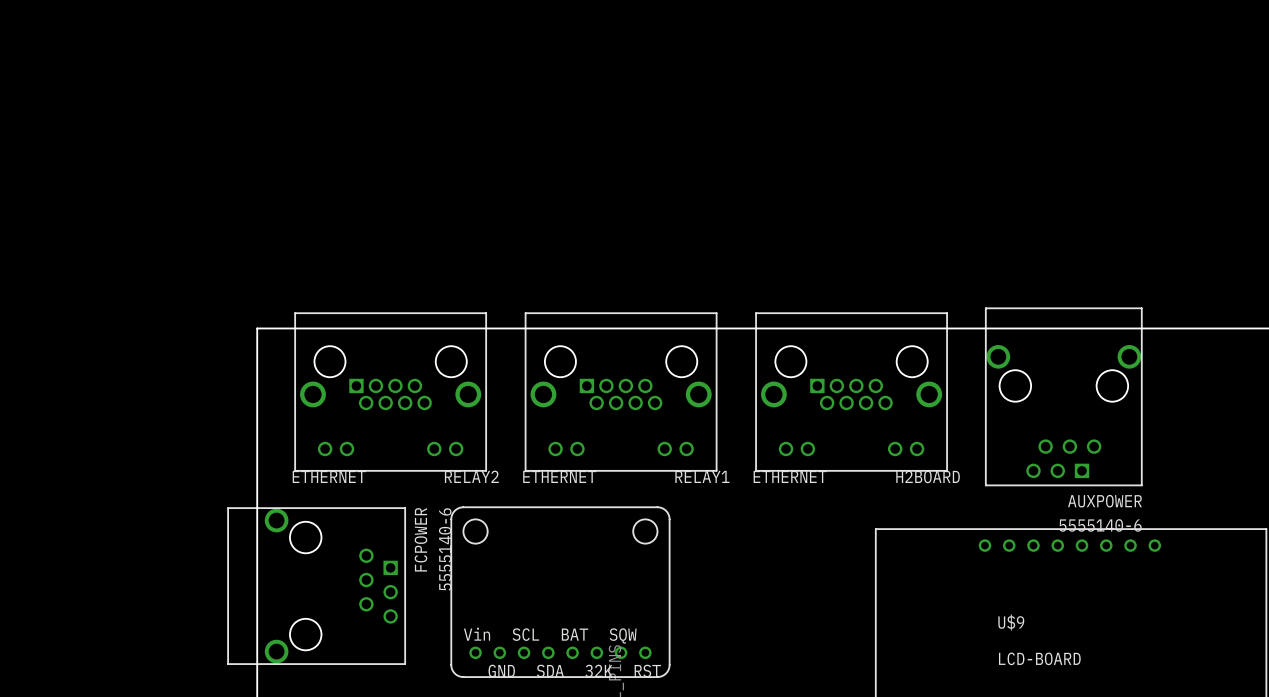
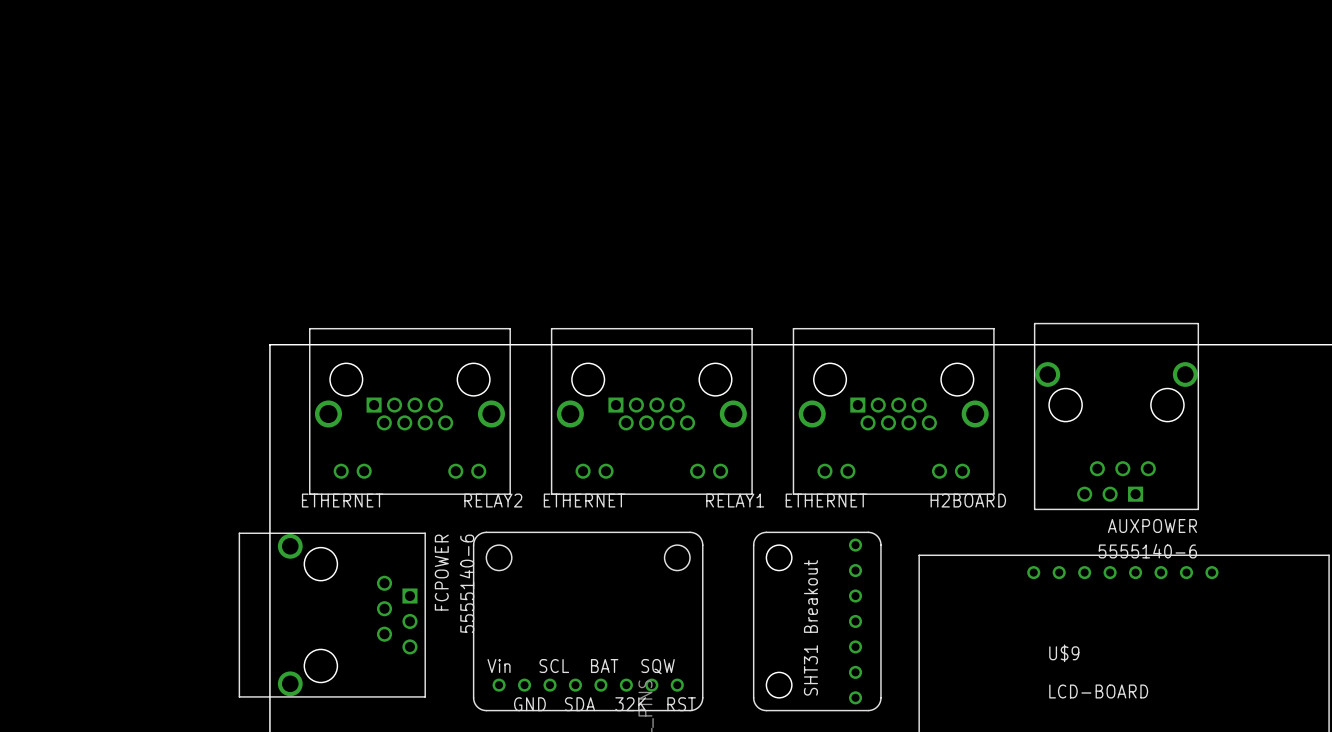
part: none -> (817, 621)

